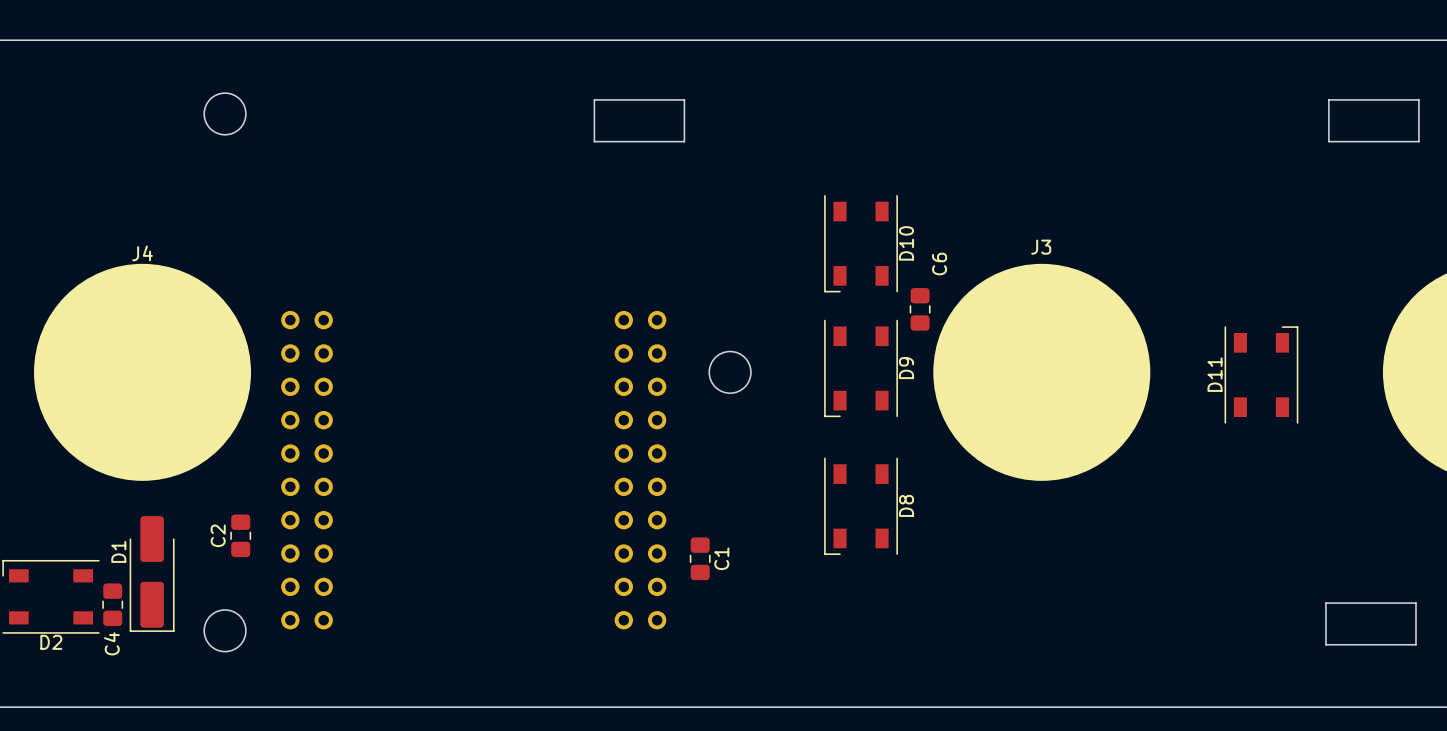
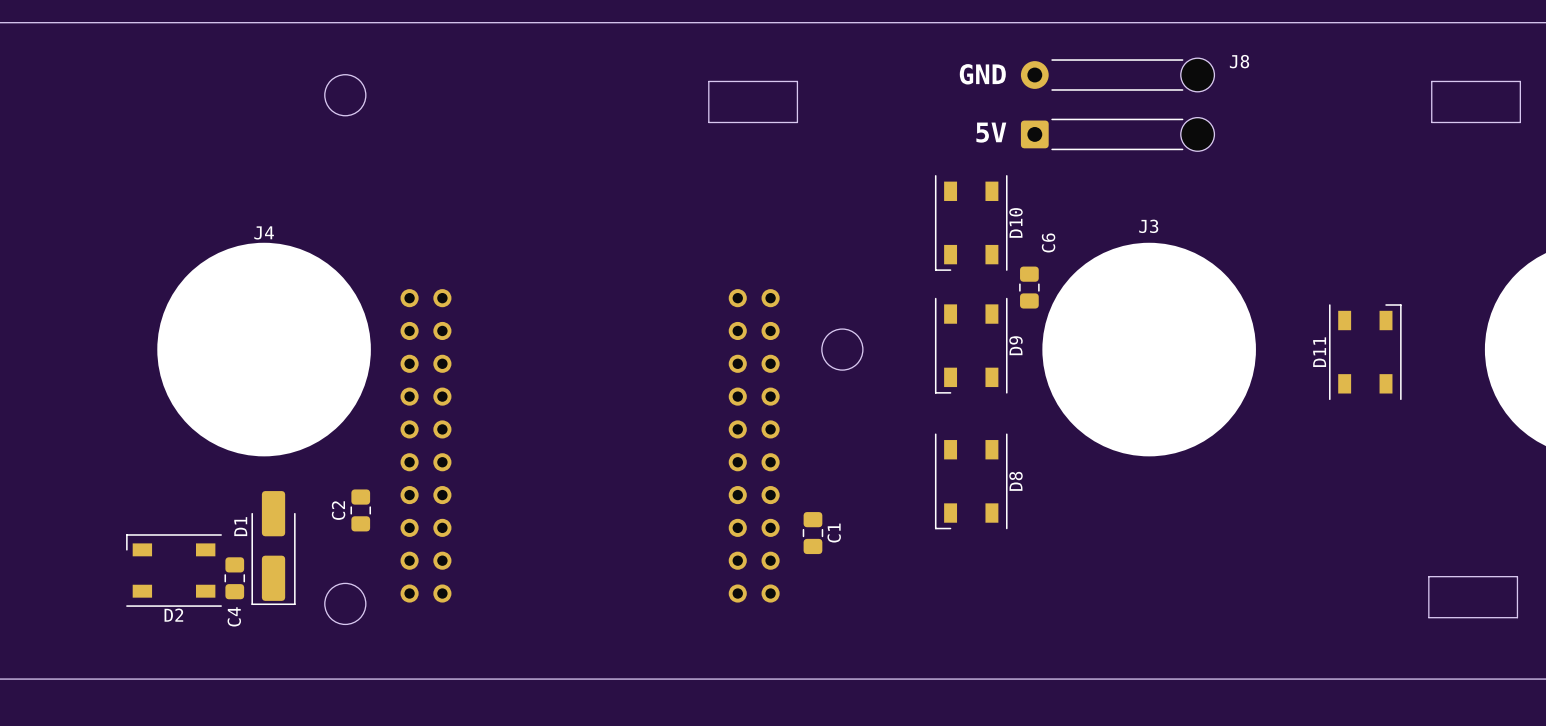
text: none -> GND (982, 74)
J8: none -> (1117, 104)
text: none -> 5V (991, 132)

